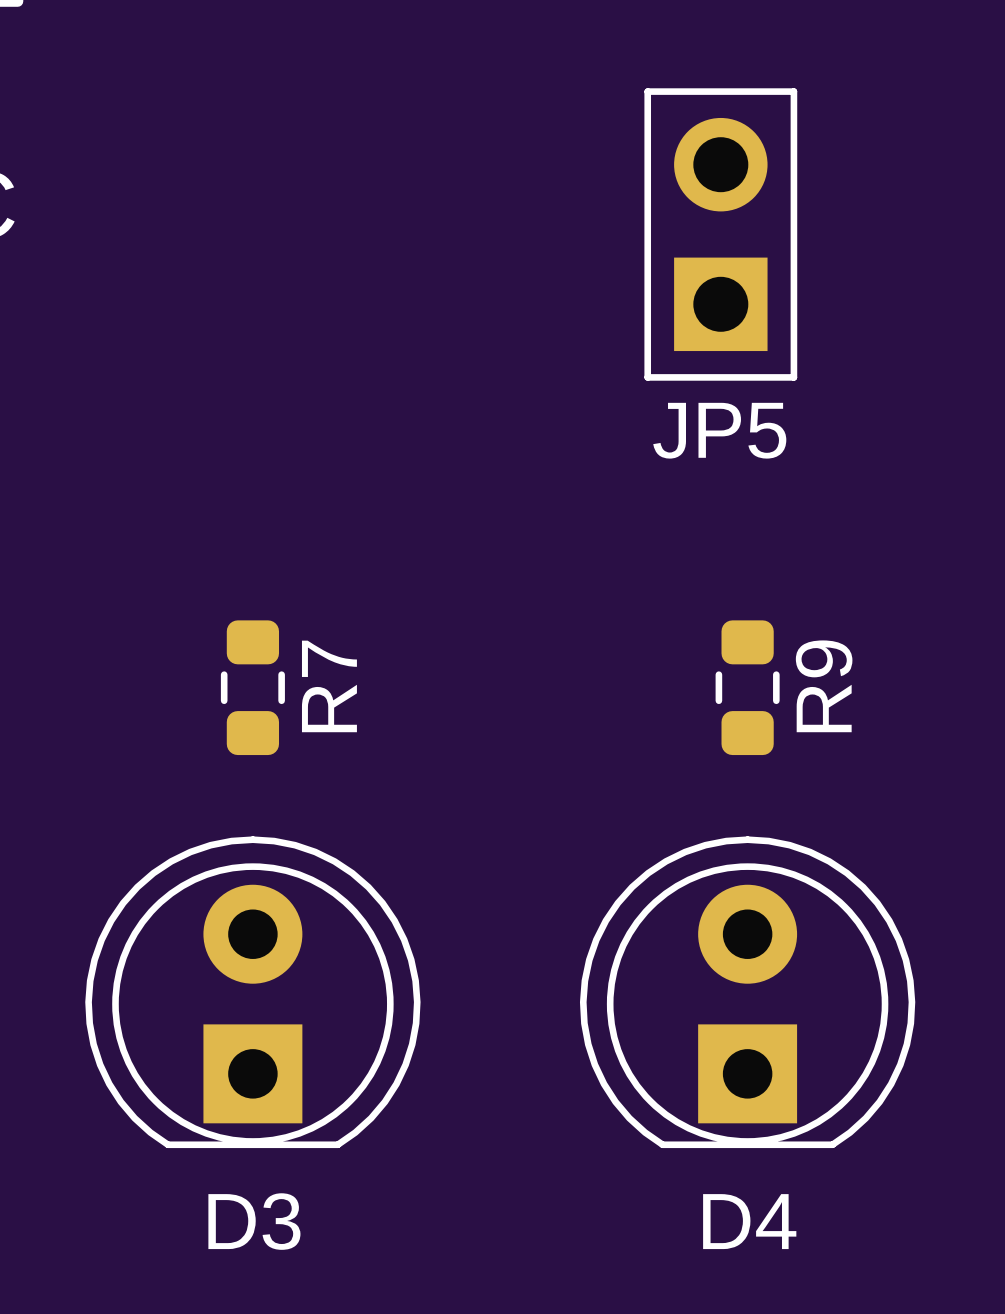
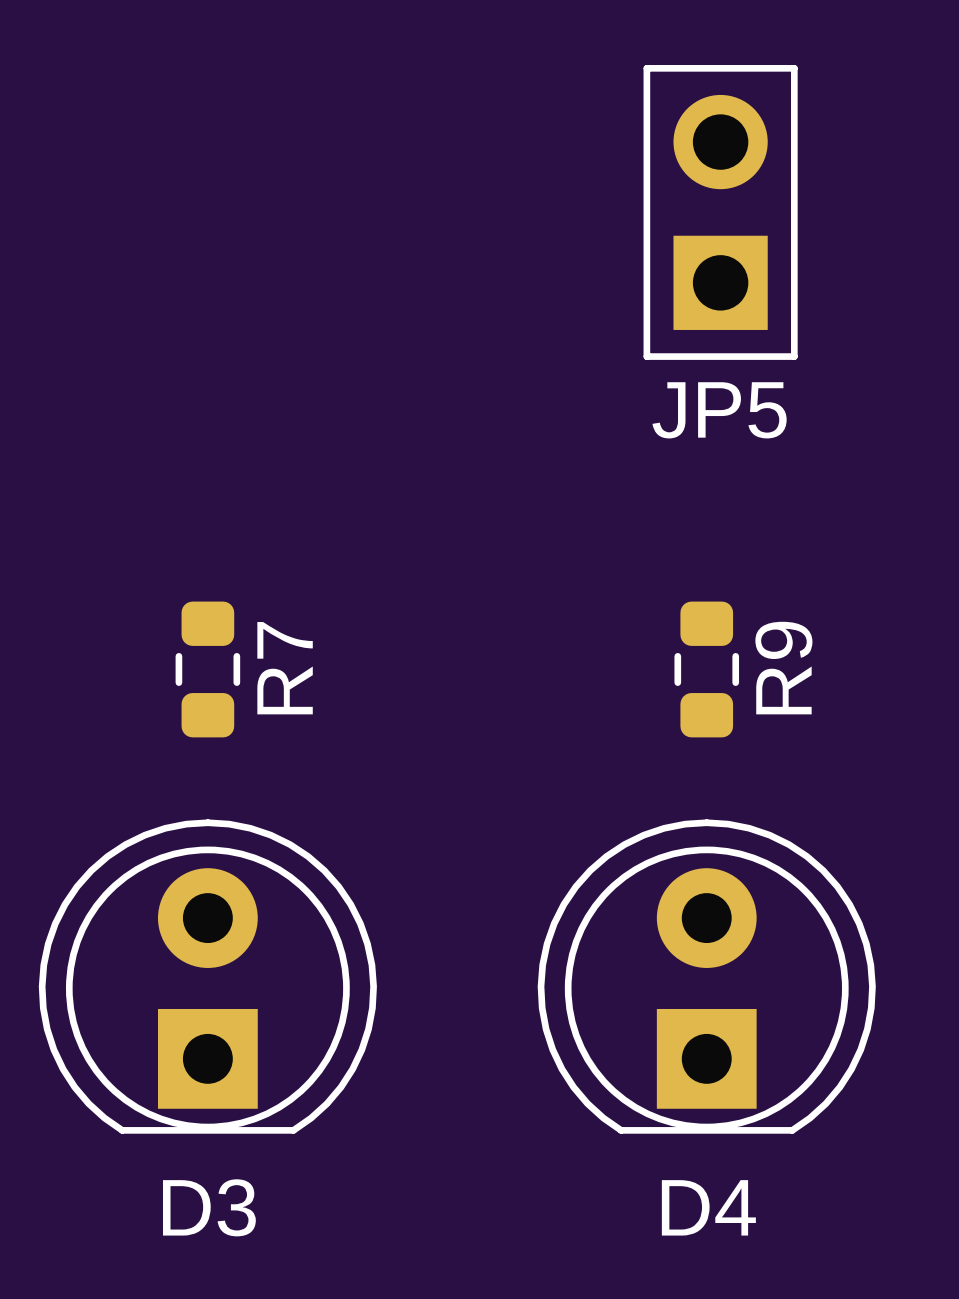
JP5 position: (720, 234) -> (720, 212)

